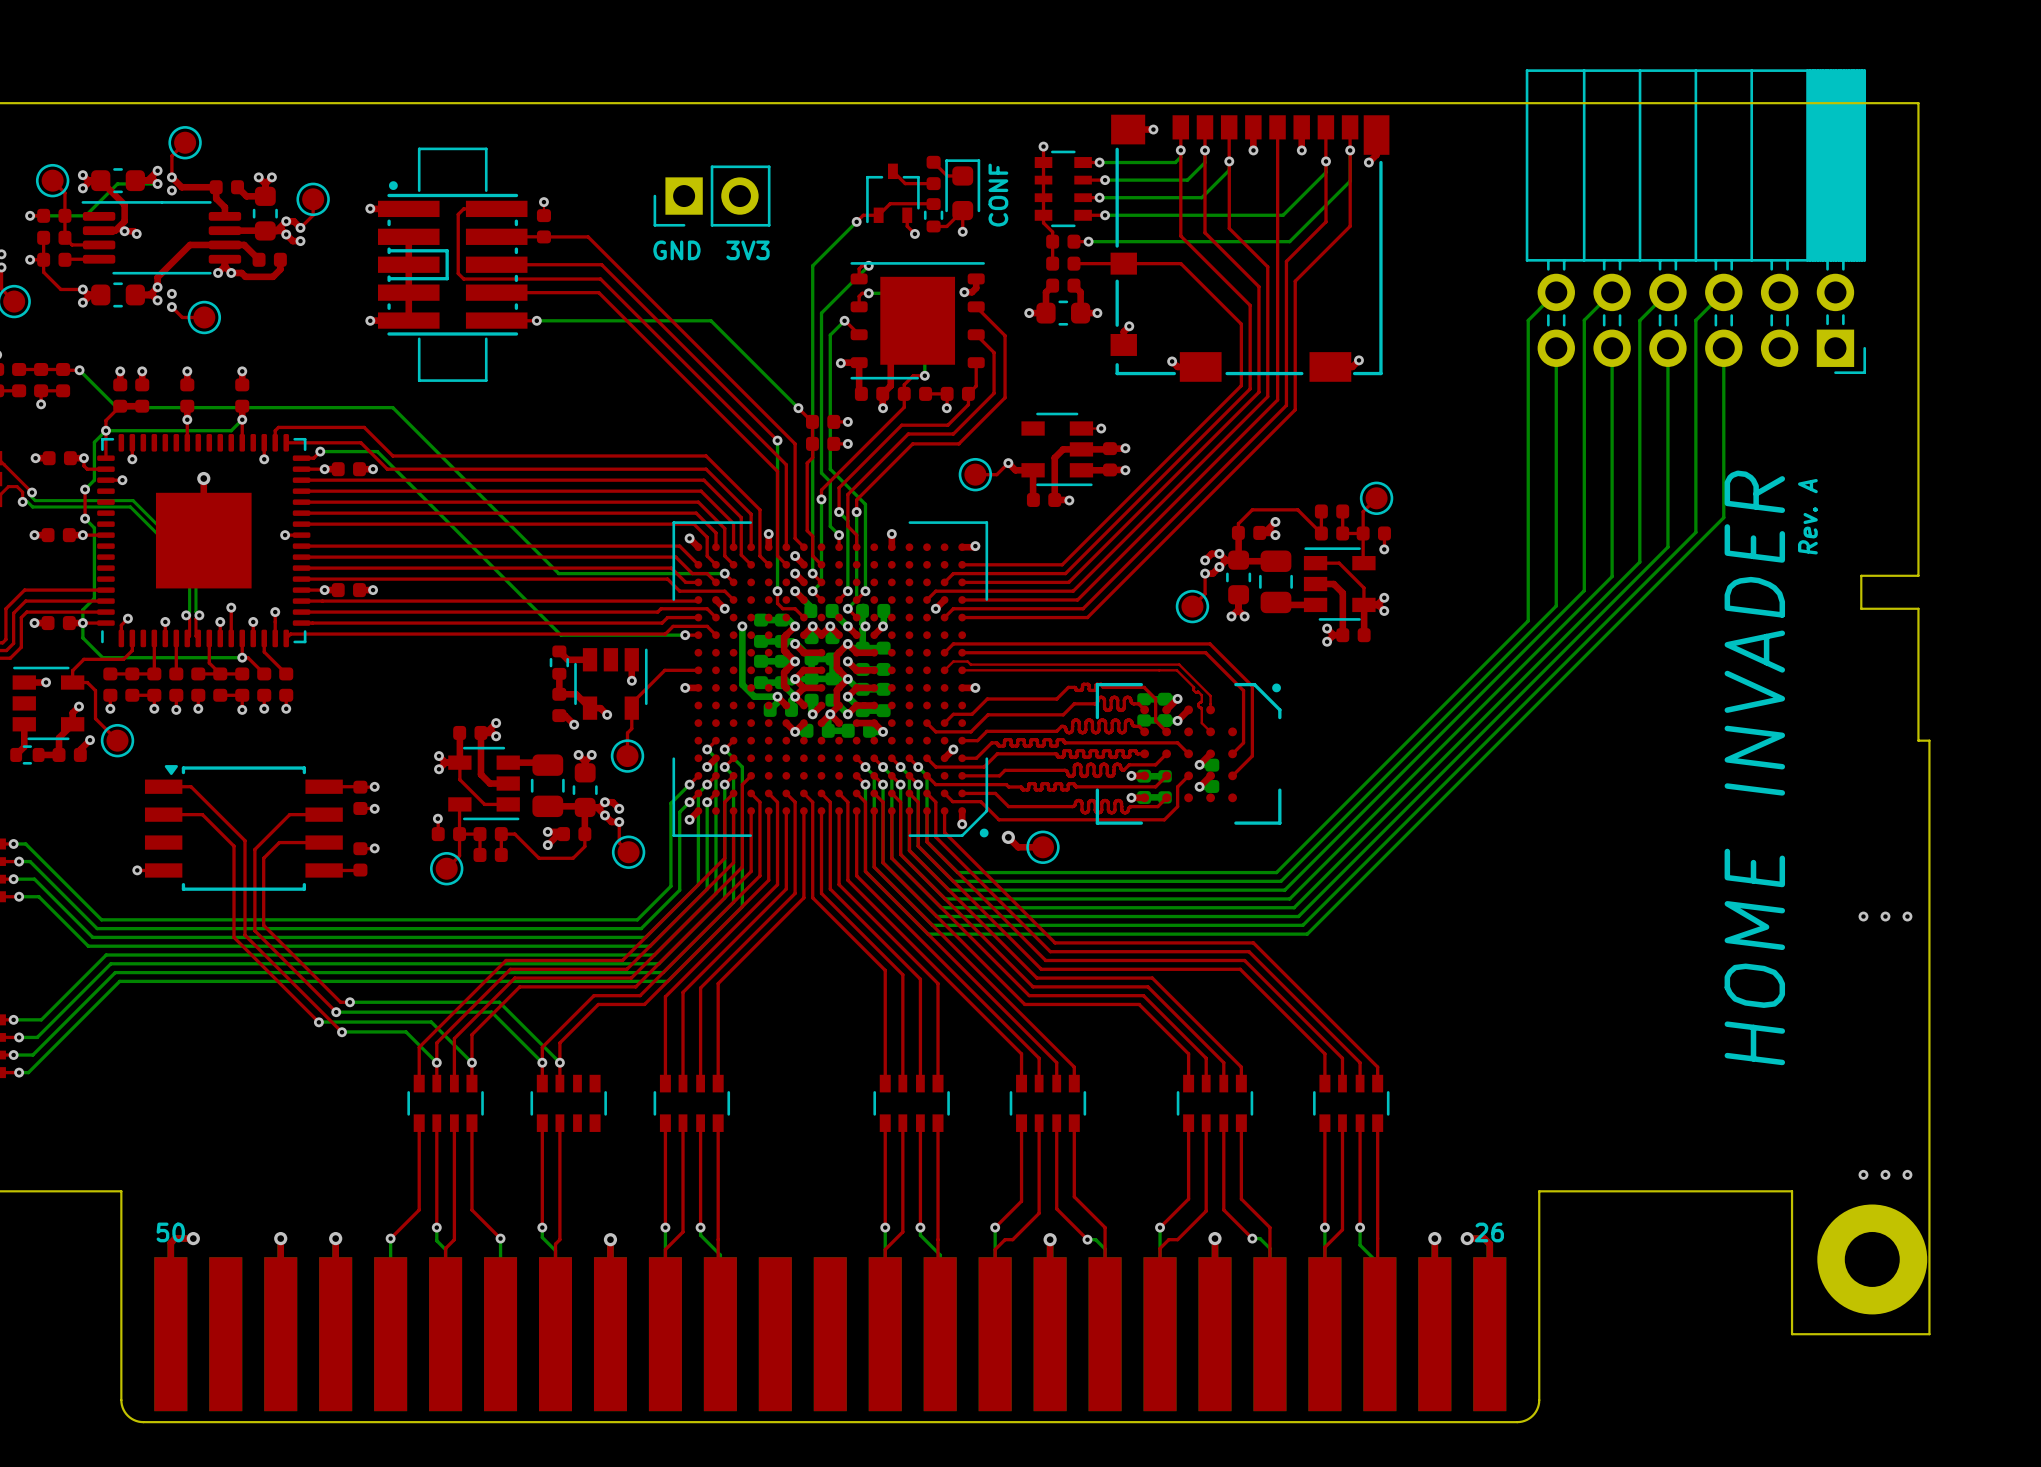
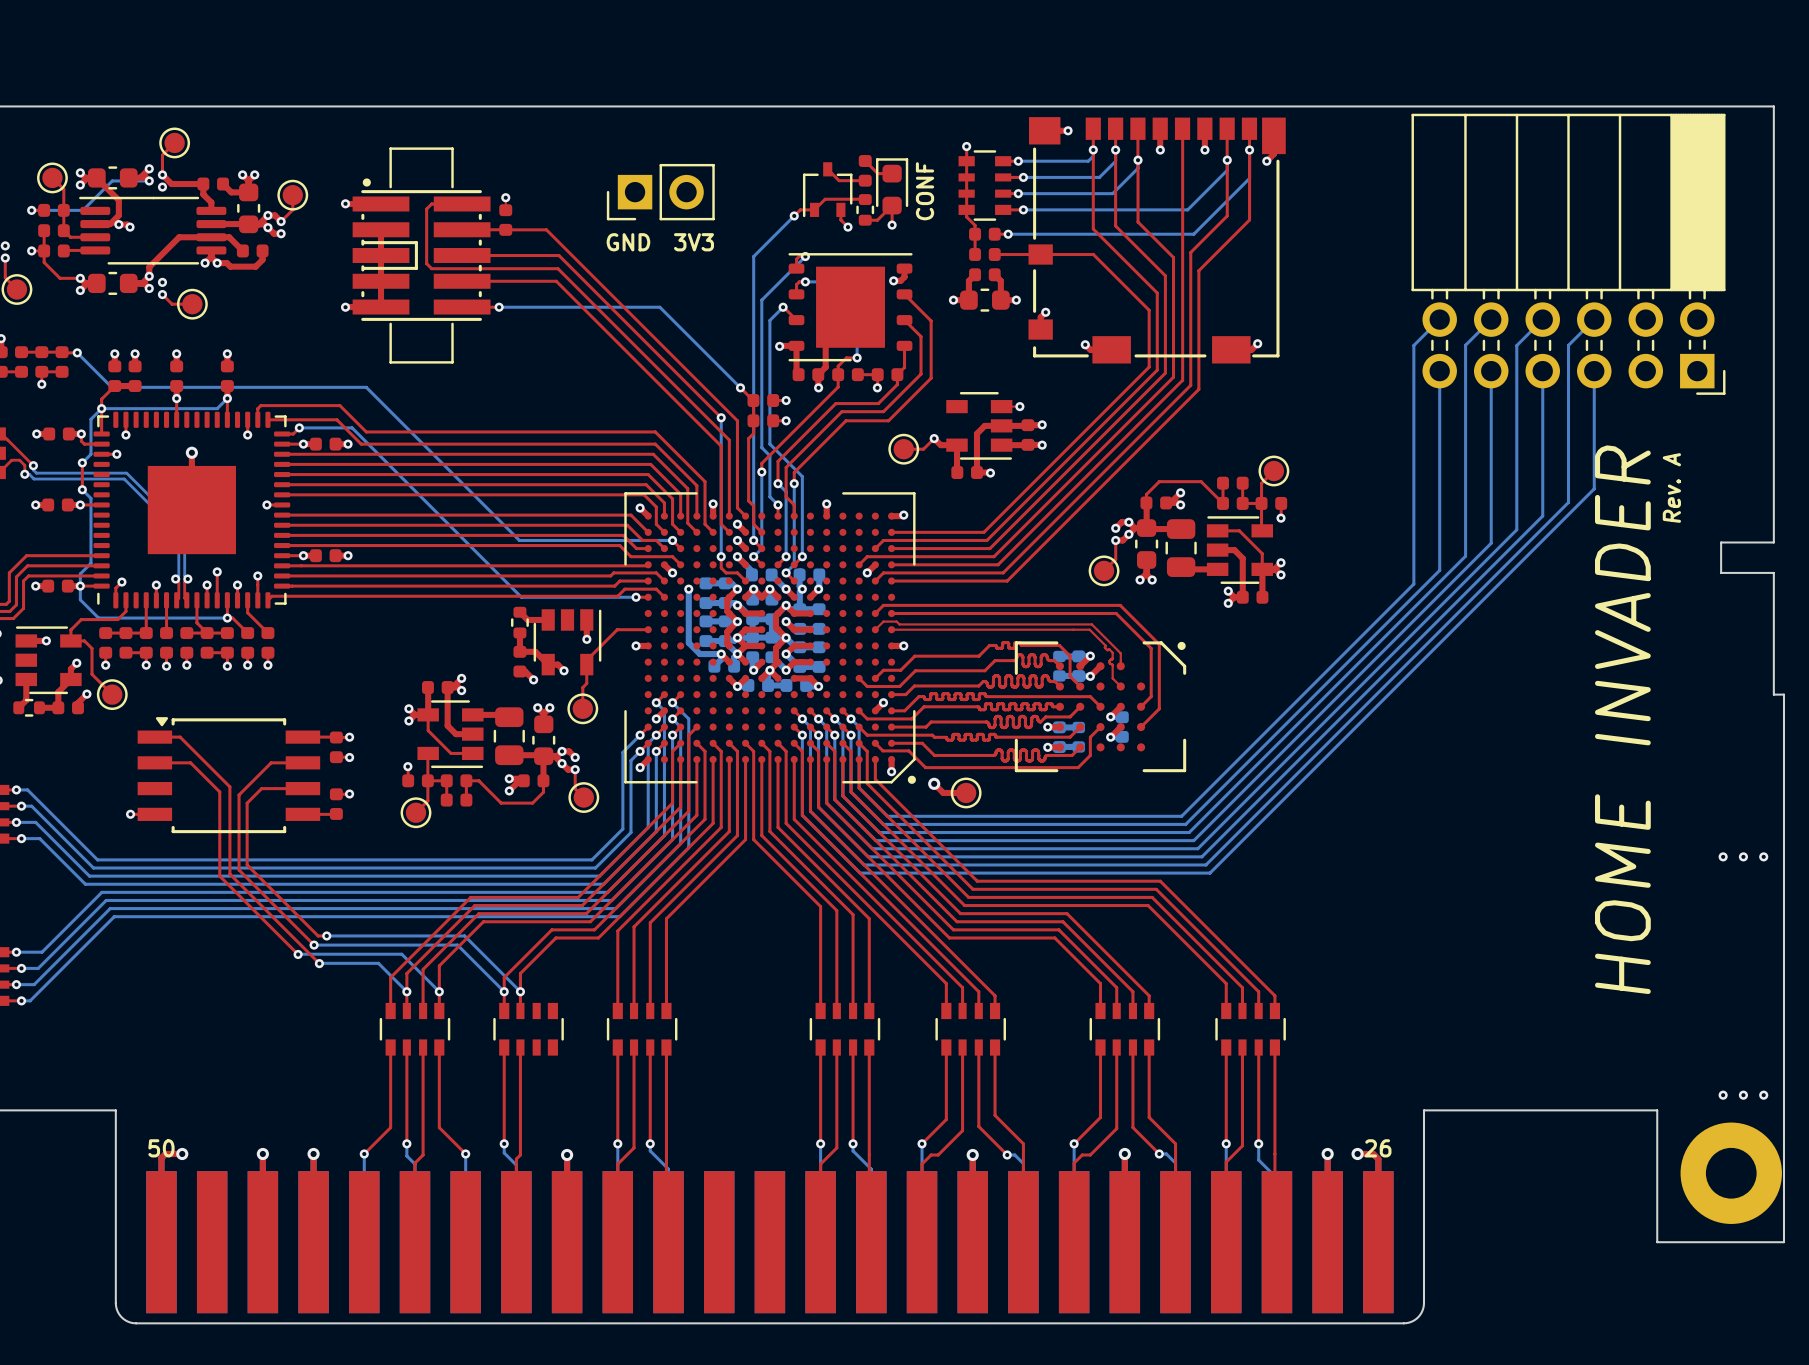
part position: (1695, 221) -> (1568, 254)
bottom track: (1556, 292) (1528, 320) (1528, 362) -> (1439, 319) (1413, 345)
bottom track: (1612, 292) (1584, 320) (1584, 362) -> (1491, 319) (1465, 345)
bottom track: (1667, 292) (1639, 320) (1639, 362) -> (1542, 319) (1516, 345)
bottom track: (1723, 292) (1695, 320) (1695, 362) -> (1594, 319) (1568, 345)
bottom track: (1556, 348) (1556, 390) -> none
bottom track: (1612, 348) (1612, 390) -> none
bottom track: (1667, 348) (1667, 390) -> none
bottom track: (1723, 348) (1723, 390) -> none

